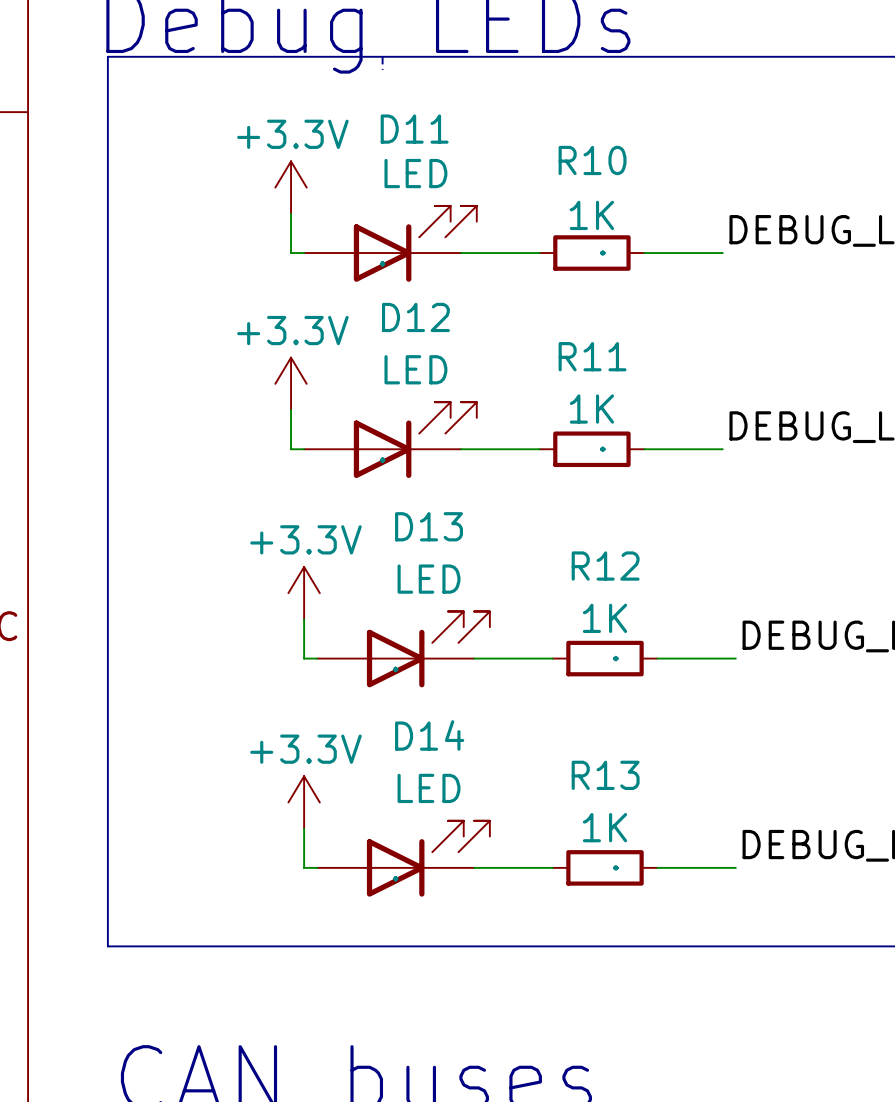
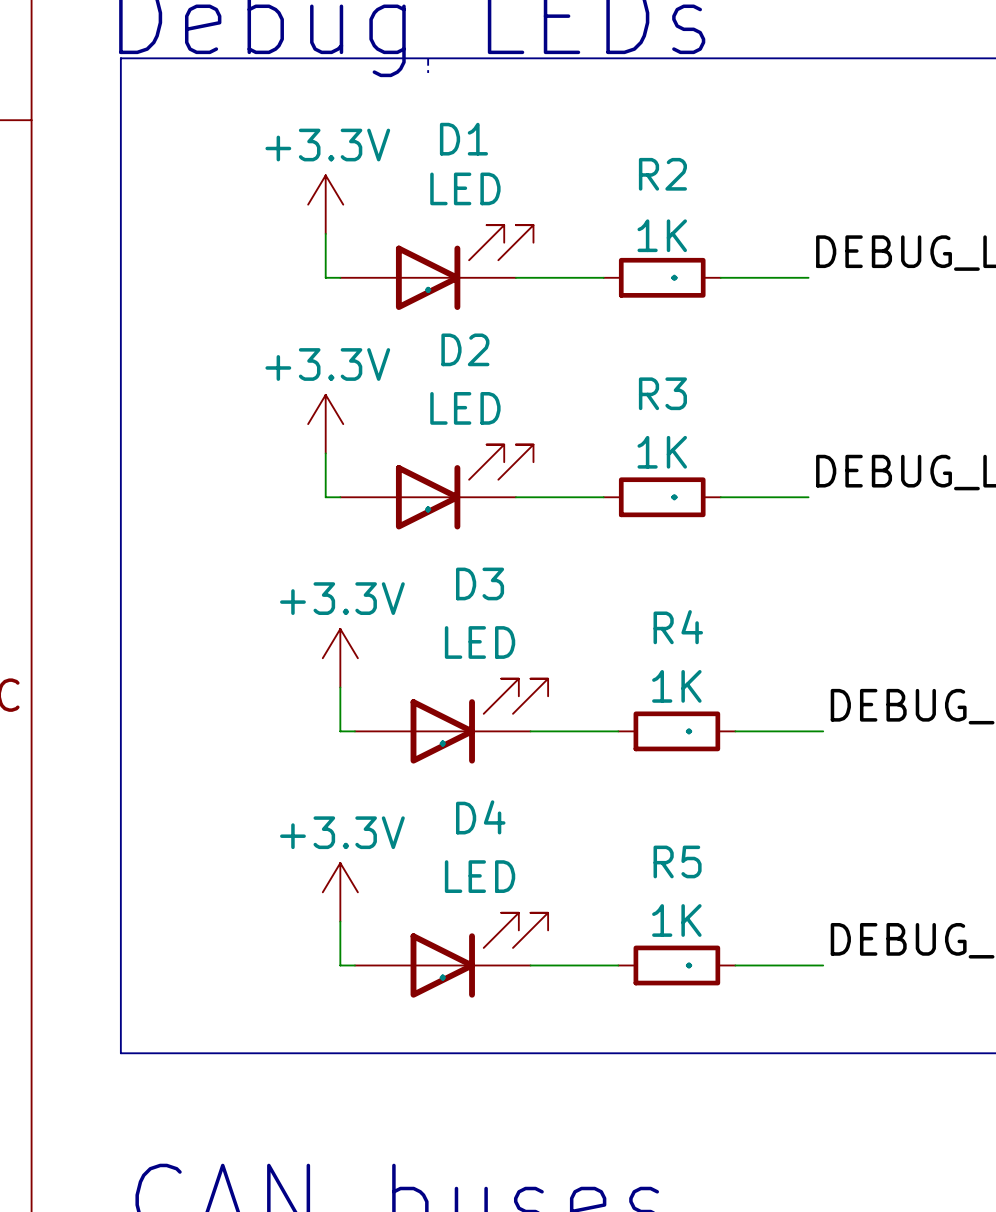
D11 name: D11 (414, 129) -> D1 (463, 139)
R10 name: R10 (592, 160) -> R2 (662, 174)
D12 name: D12 (415, 317) -> D2 (465, 349)
R11 name: R11 (592, 356) -> R3 (662, 393)
D13 name: D13 (429, 526) -> D3 (480, 583)
R12 name: R12 (605, 566) -> R4 (678, 627)
D14 name: D14 (429, 735) -> D4 (480, 817)
R13 name: R13 (605, 775) -> R5 (677, 861)

